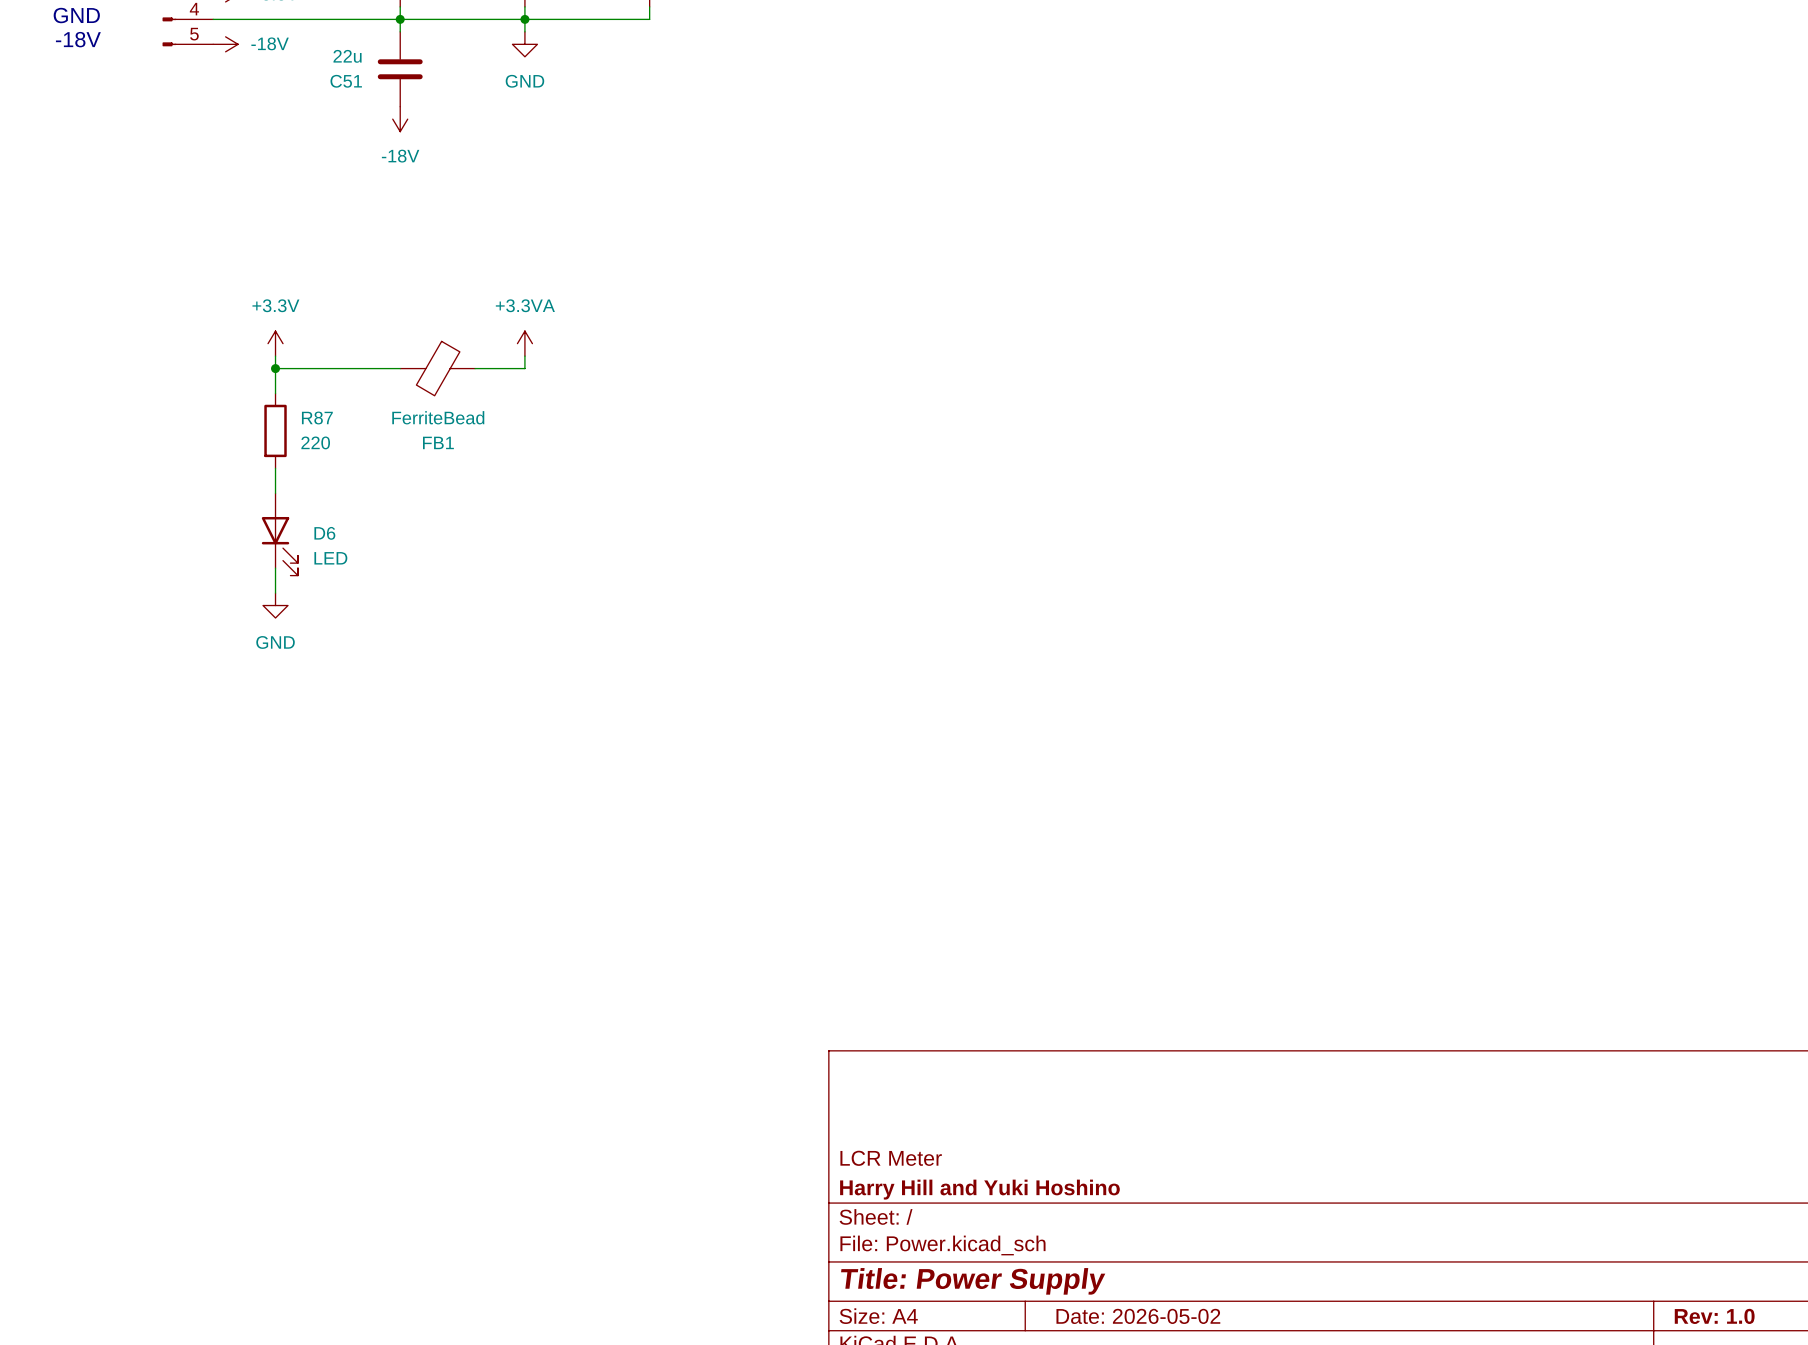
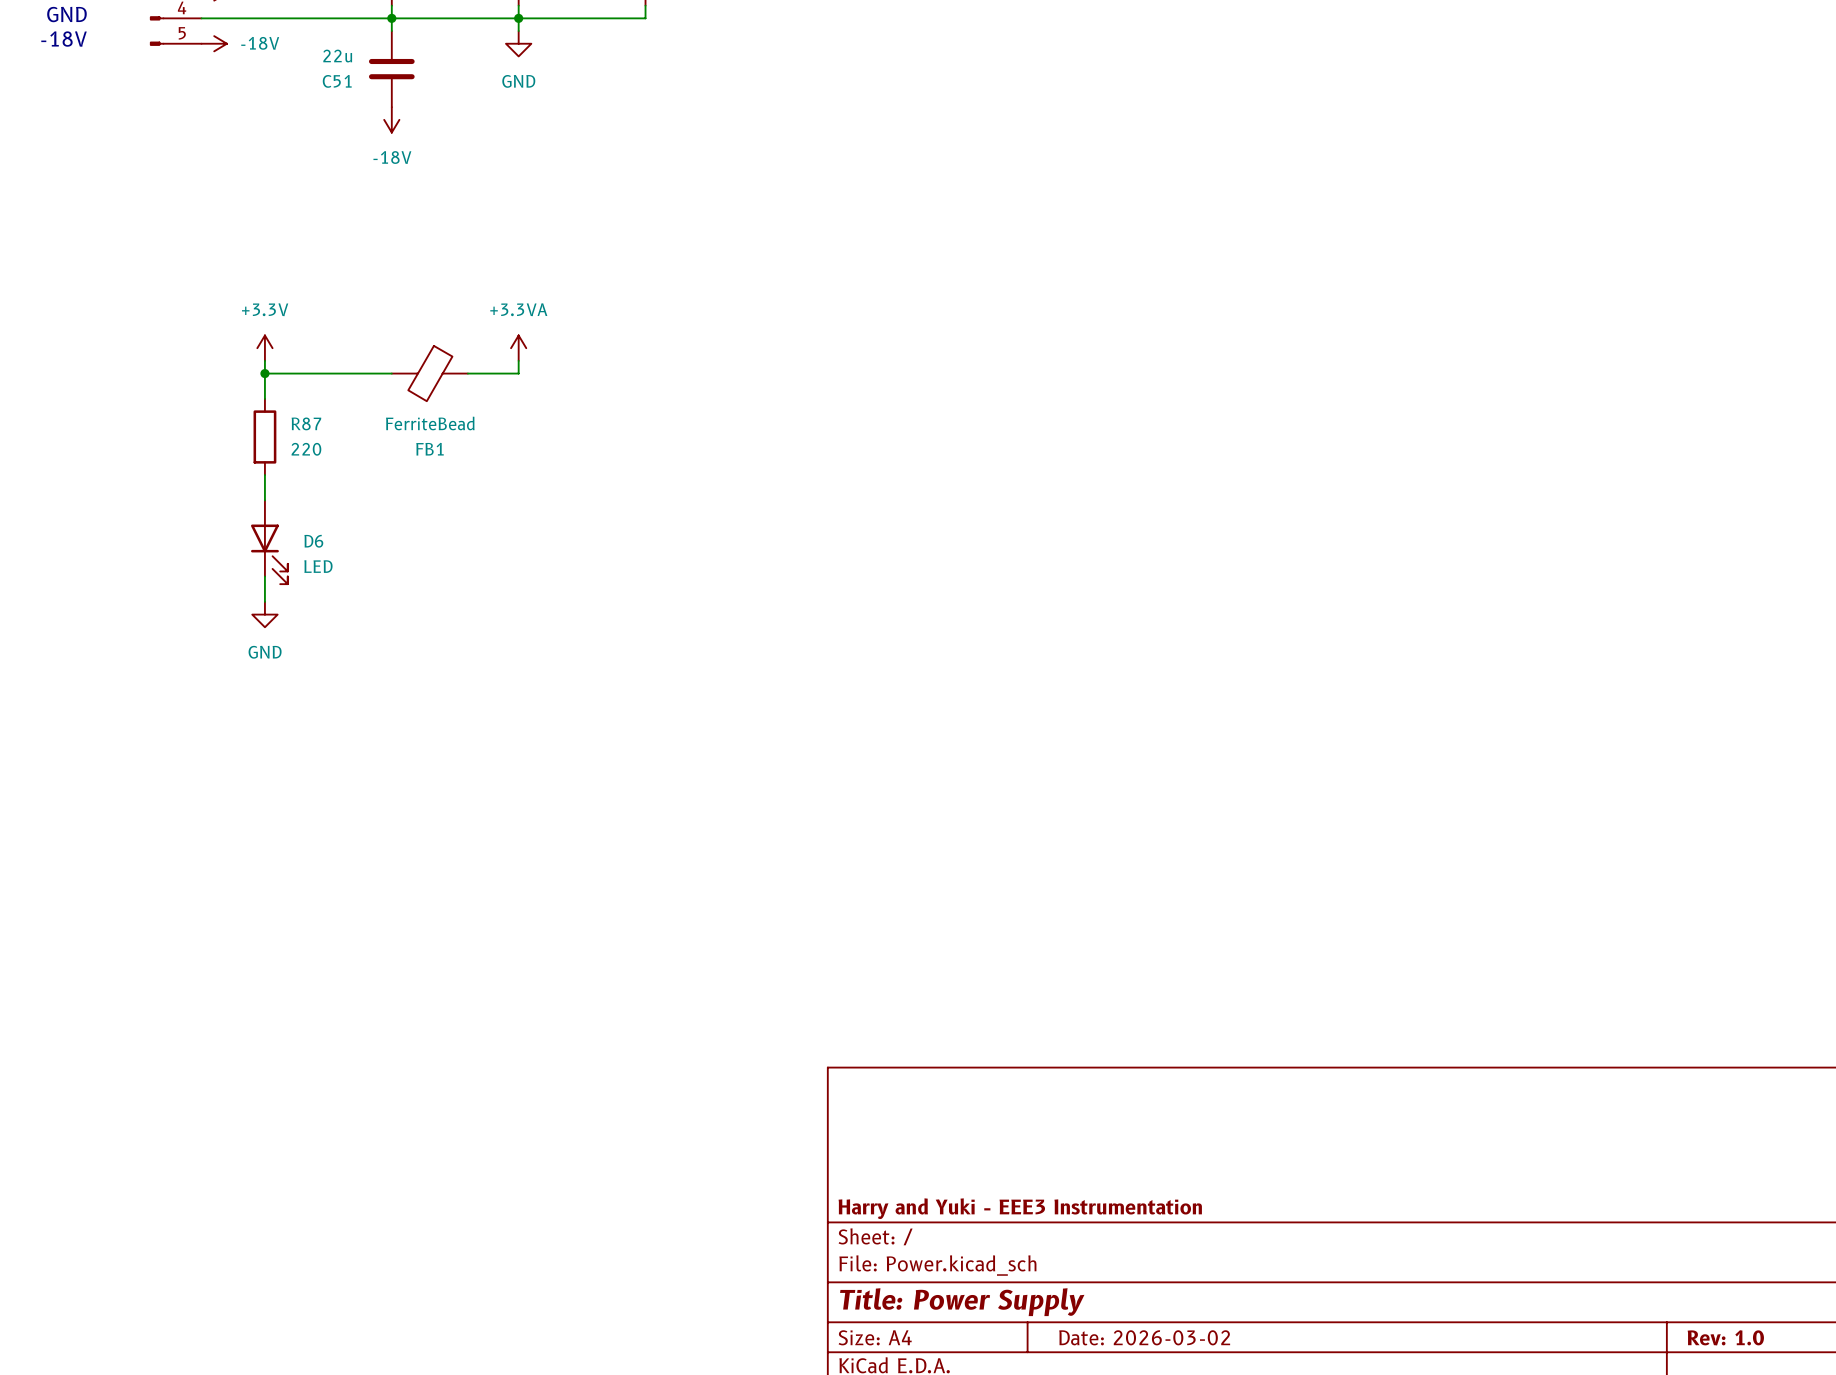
title block: LCR Meter (891, 1158) -> none
title block: Harry Hill and Yuki Hoshino (979, 1189) -> Harry and Yuki - EEE3 Instrumentation (1020, 1208)
title block: Date: 2026-05-02 (1138, 1316) -> Date: 2026-03-02 (1144, 1337)

